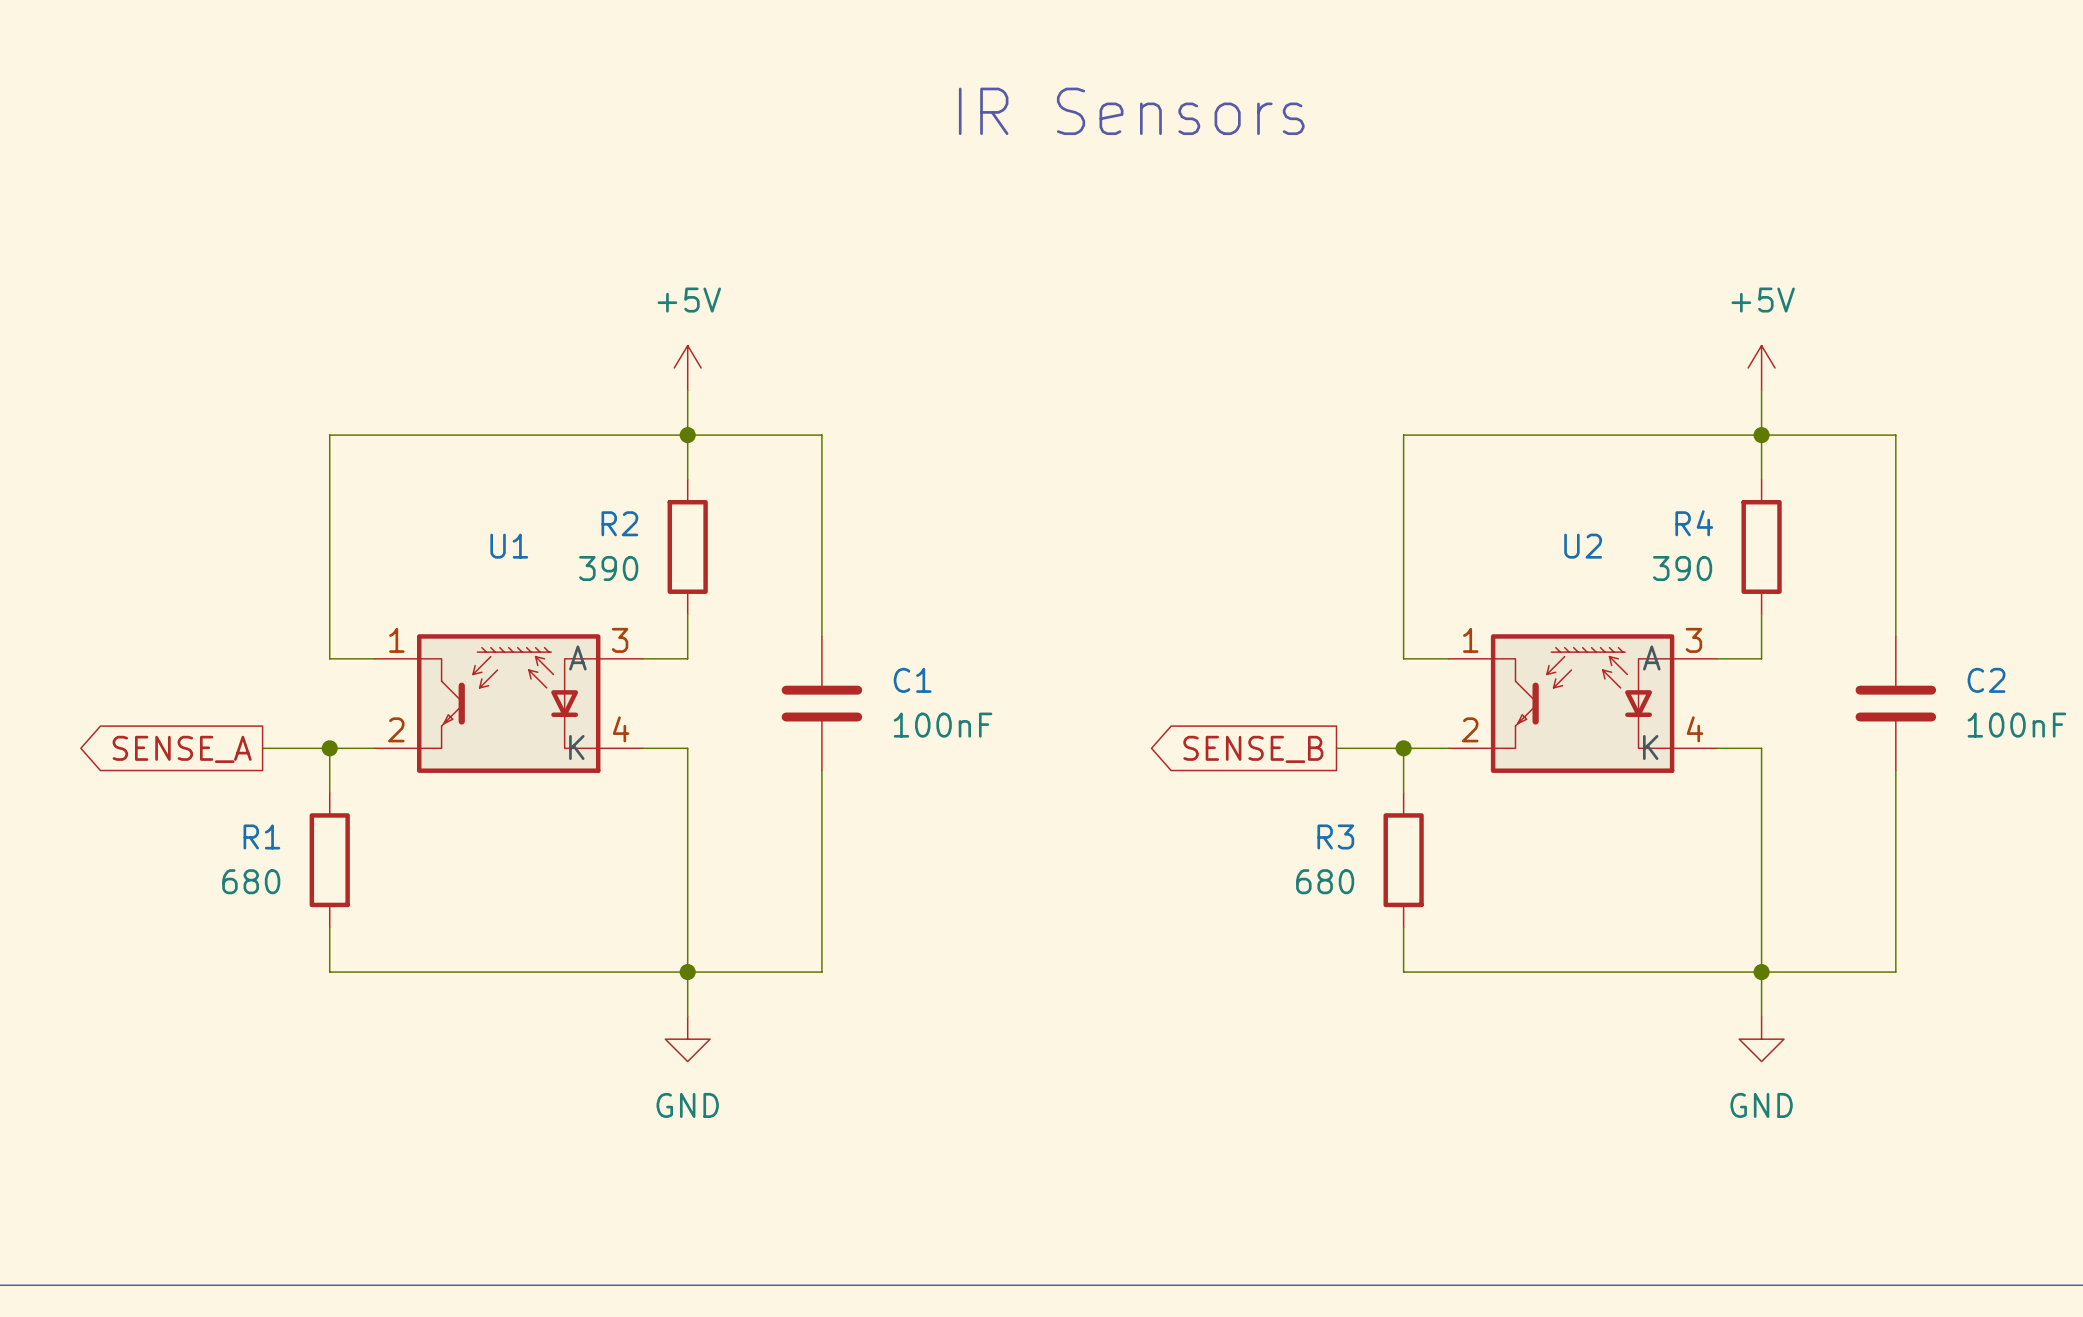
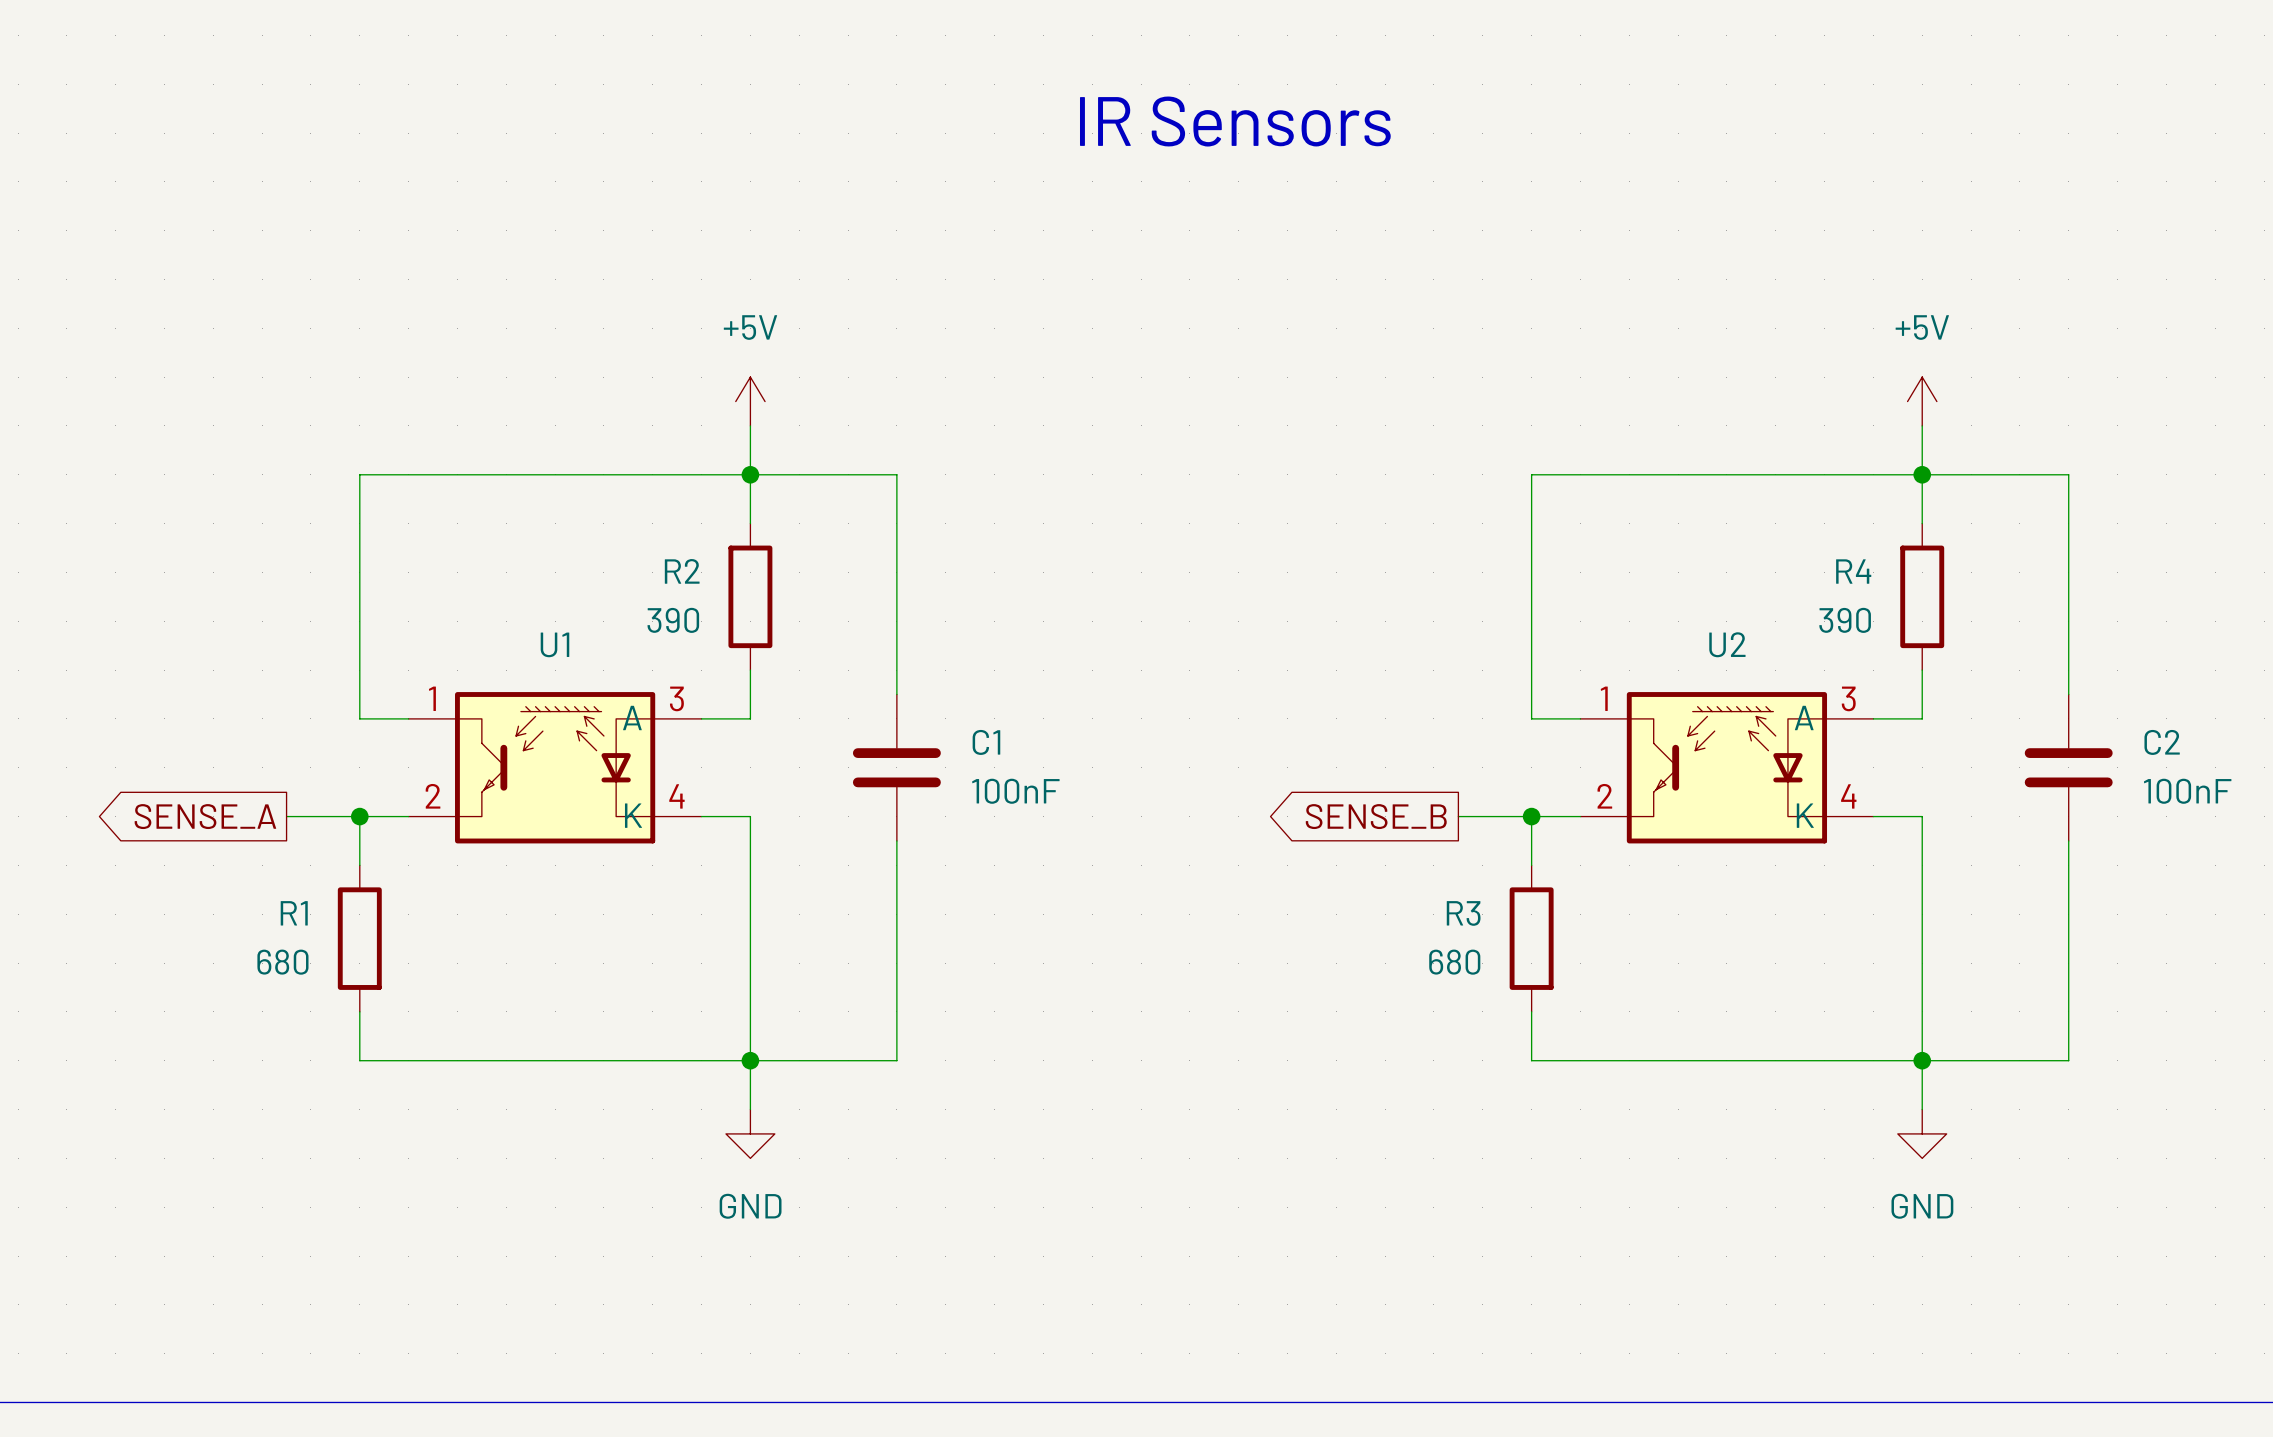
U1 name position: U1 (509, 546) -> U1 (554, 644)
U2 name position: U2 (1583, 546) -> U2 (1727, 644)

